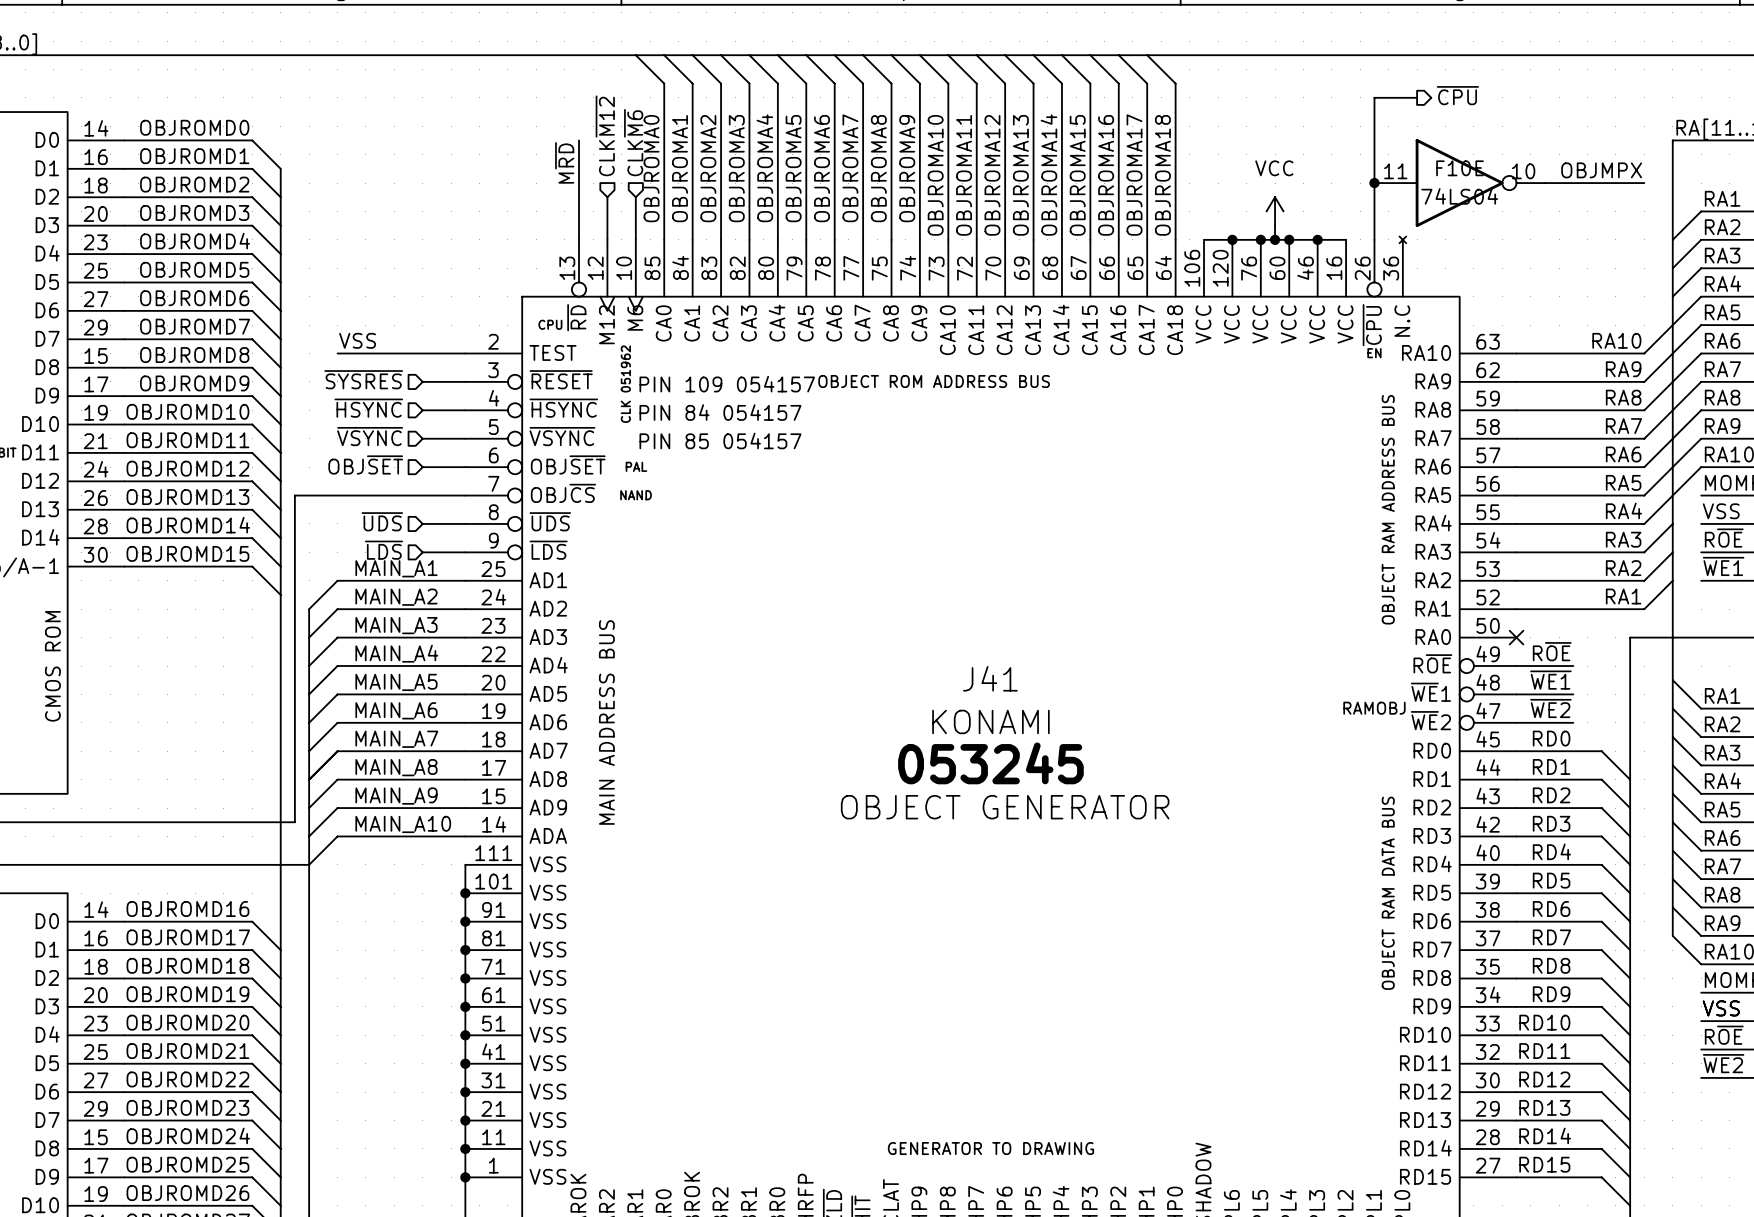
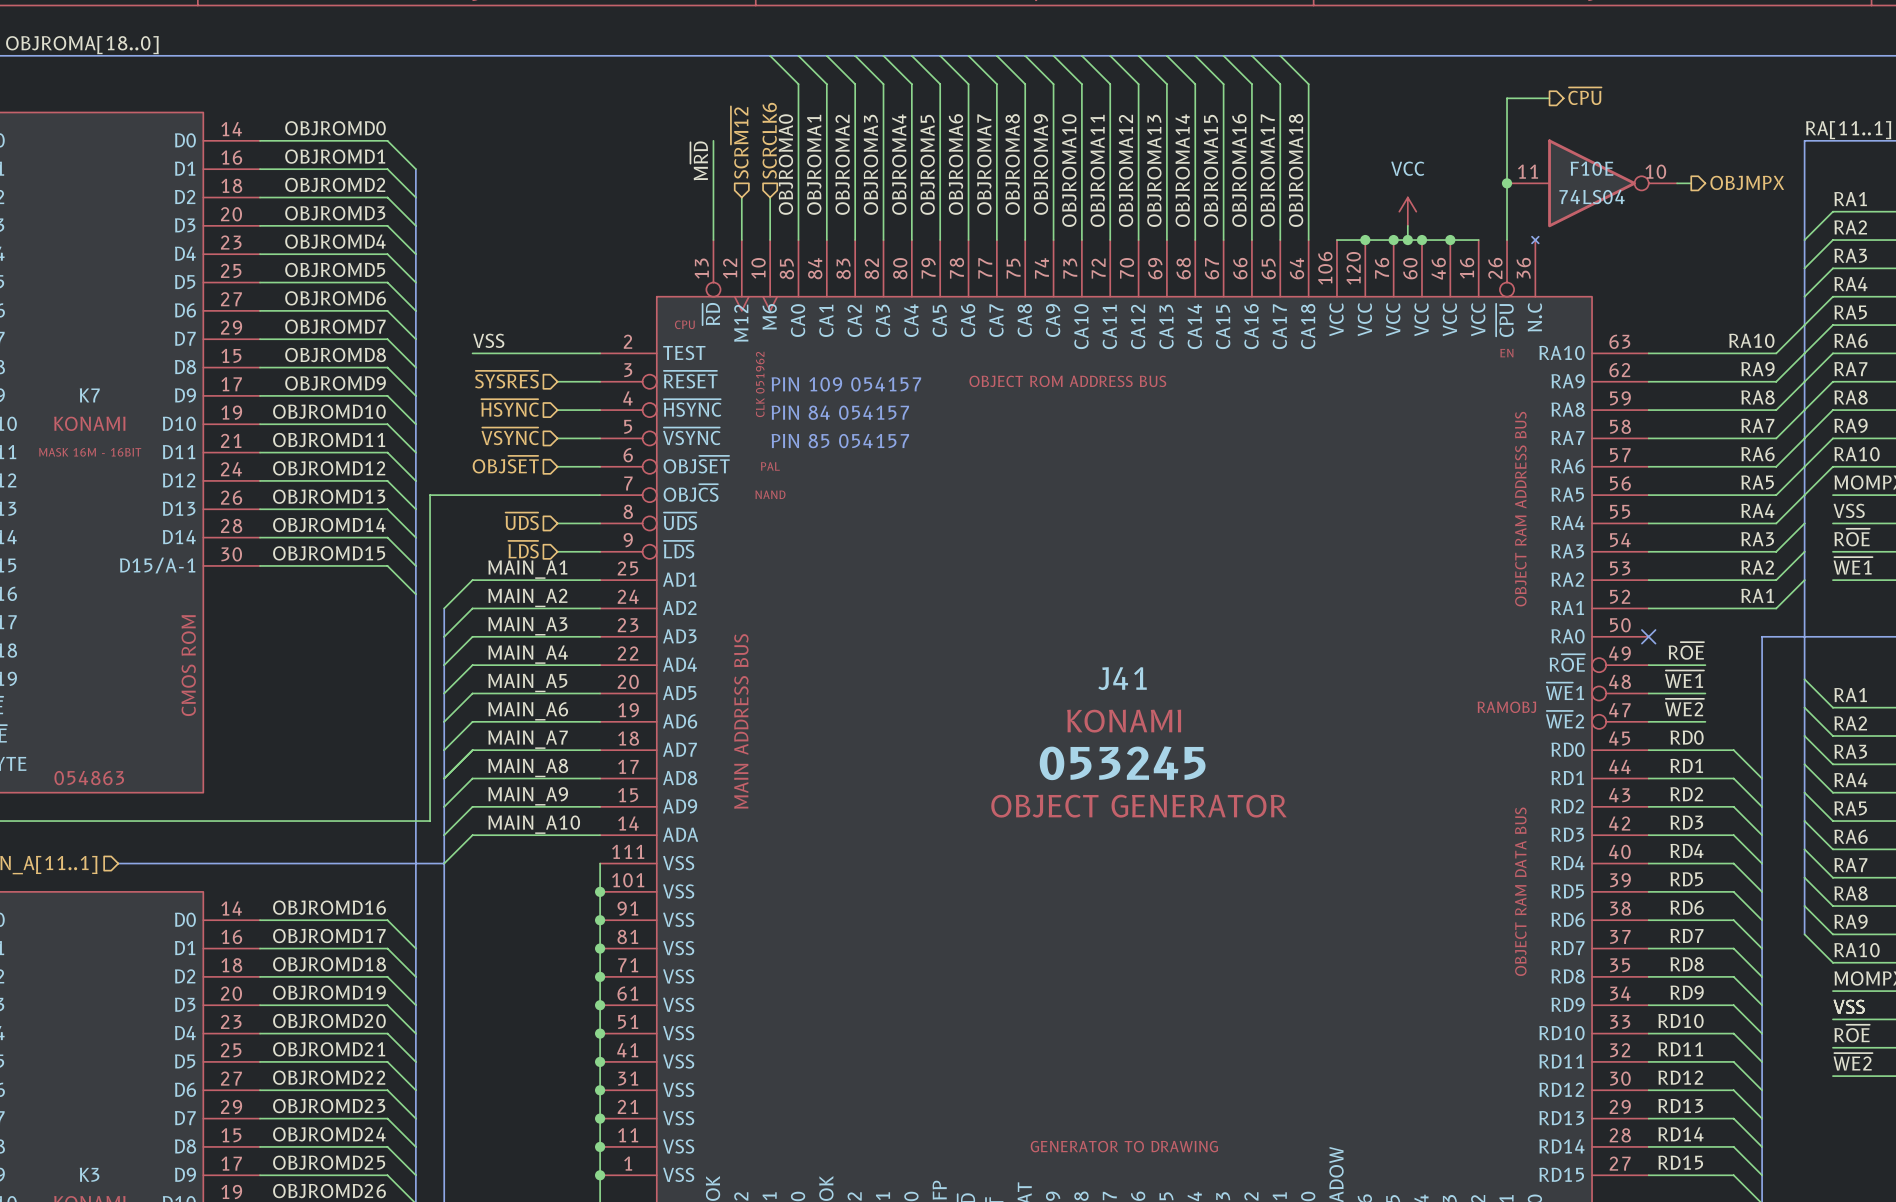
hierarchical label: CLK~{M12} (605, 135) -> SCR~{M12} (739, 142)
hierarchical label: CLK~{M6} (633, 142) -> SCRCLK6 (769, 140)
label: OBJMPX (1601, 170) -> none
hierarchical label: none -> OBJMPX (1747, 182)
wire: (1559, 183) (1644, 183) -> none

